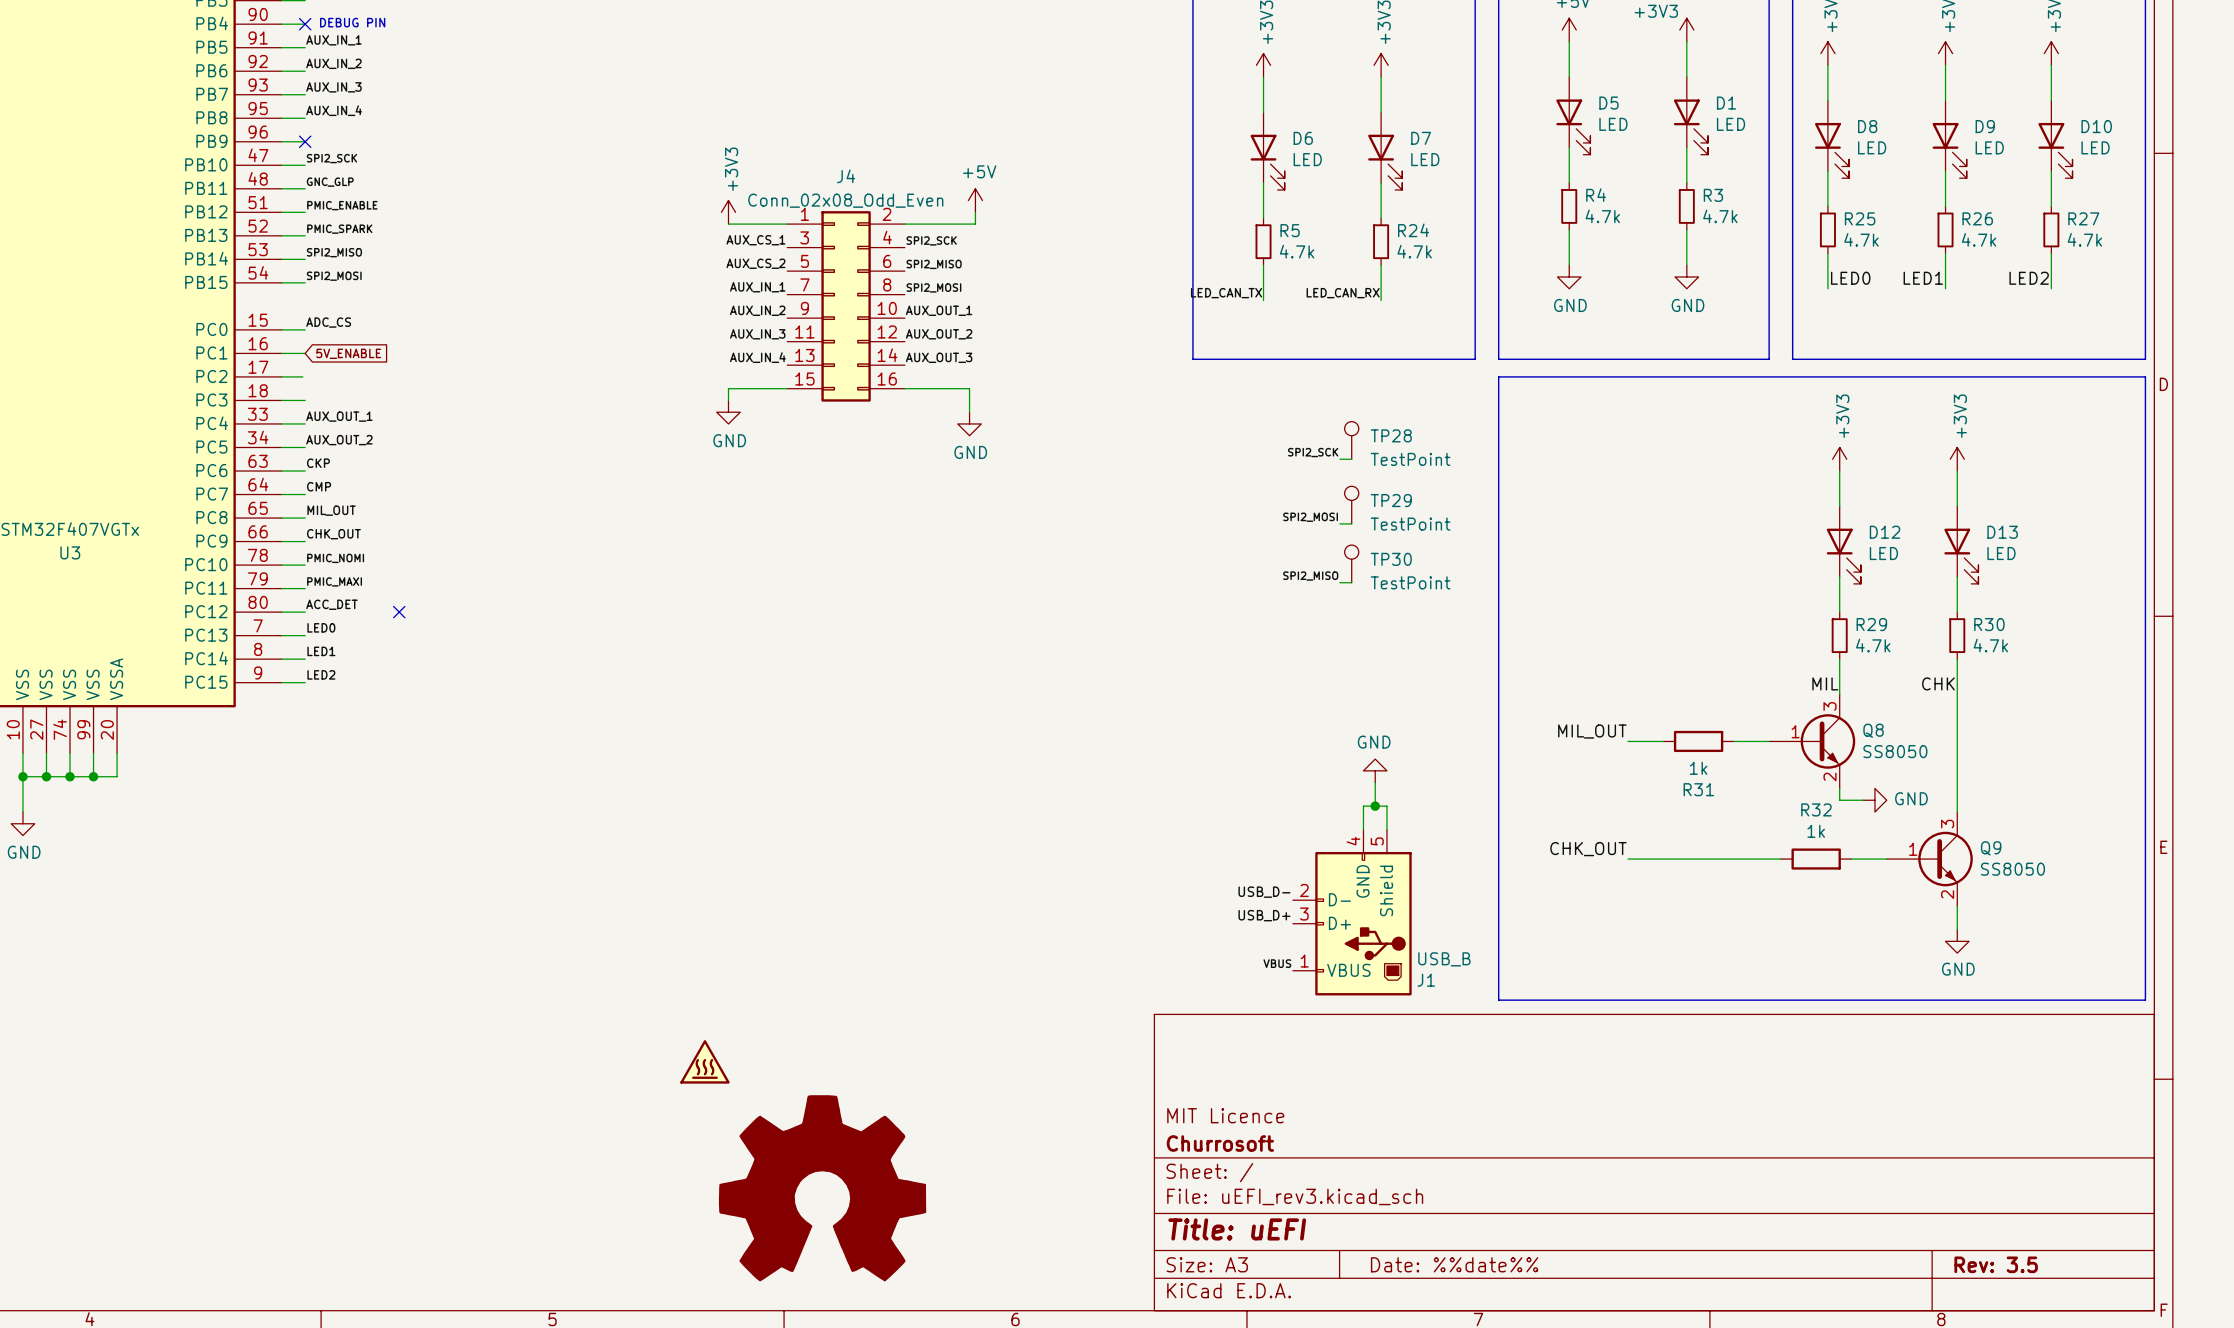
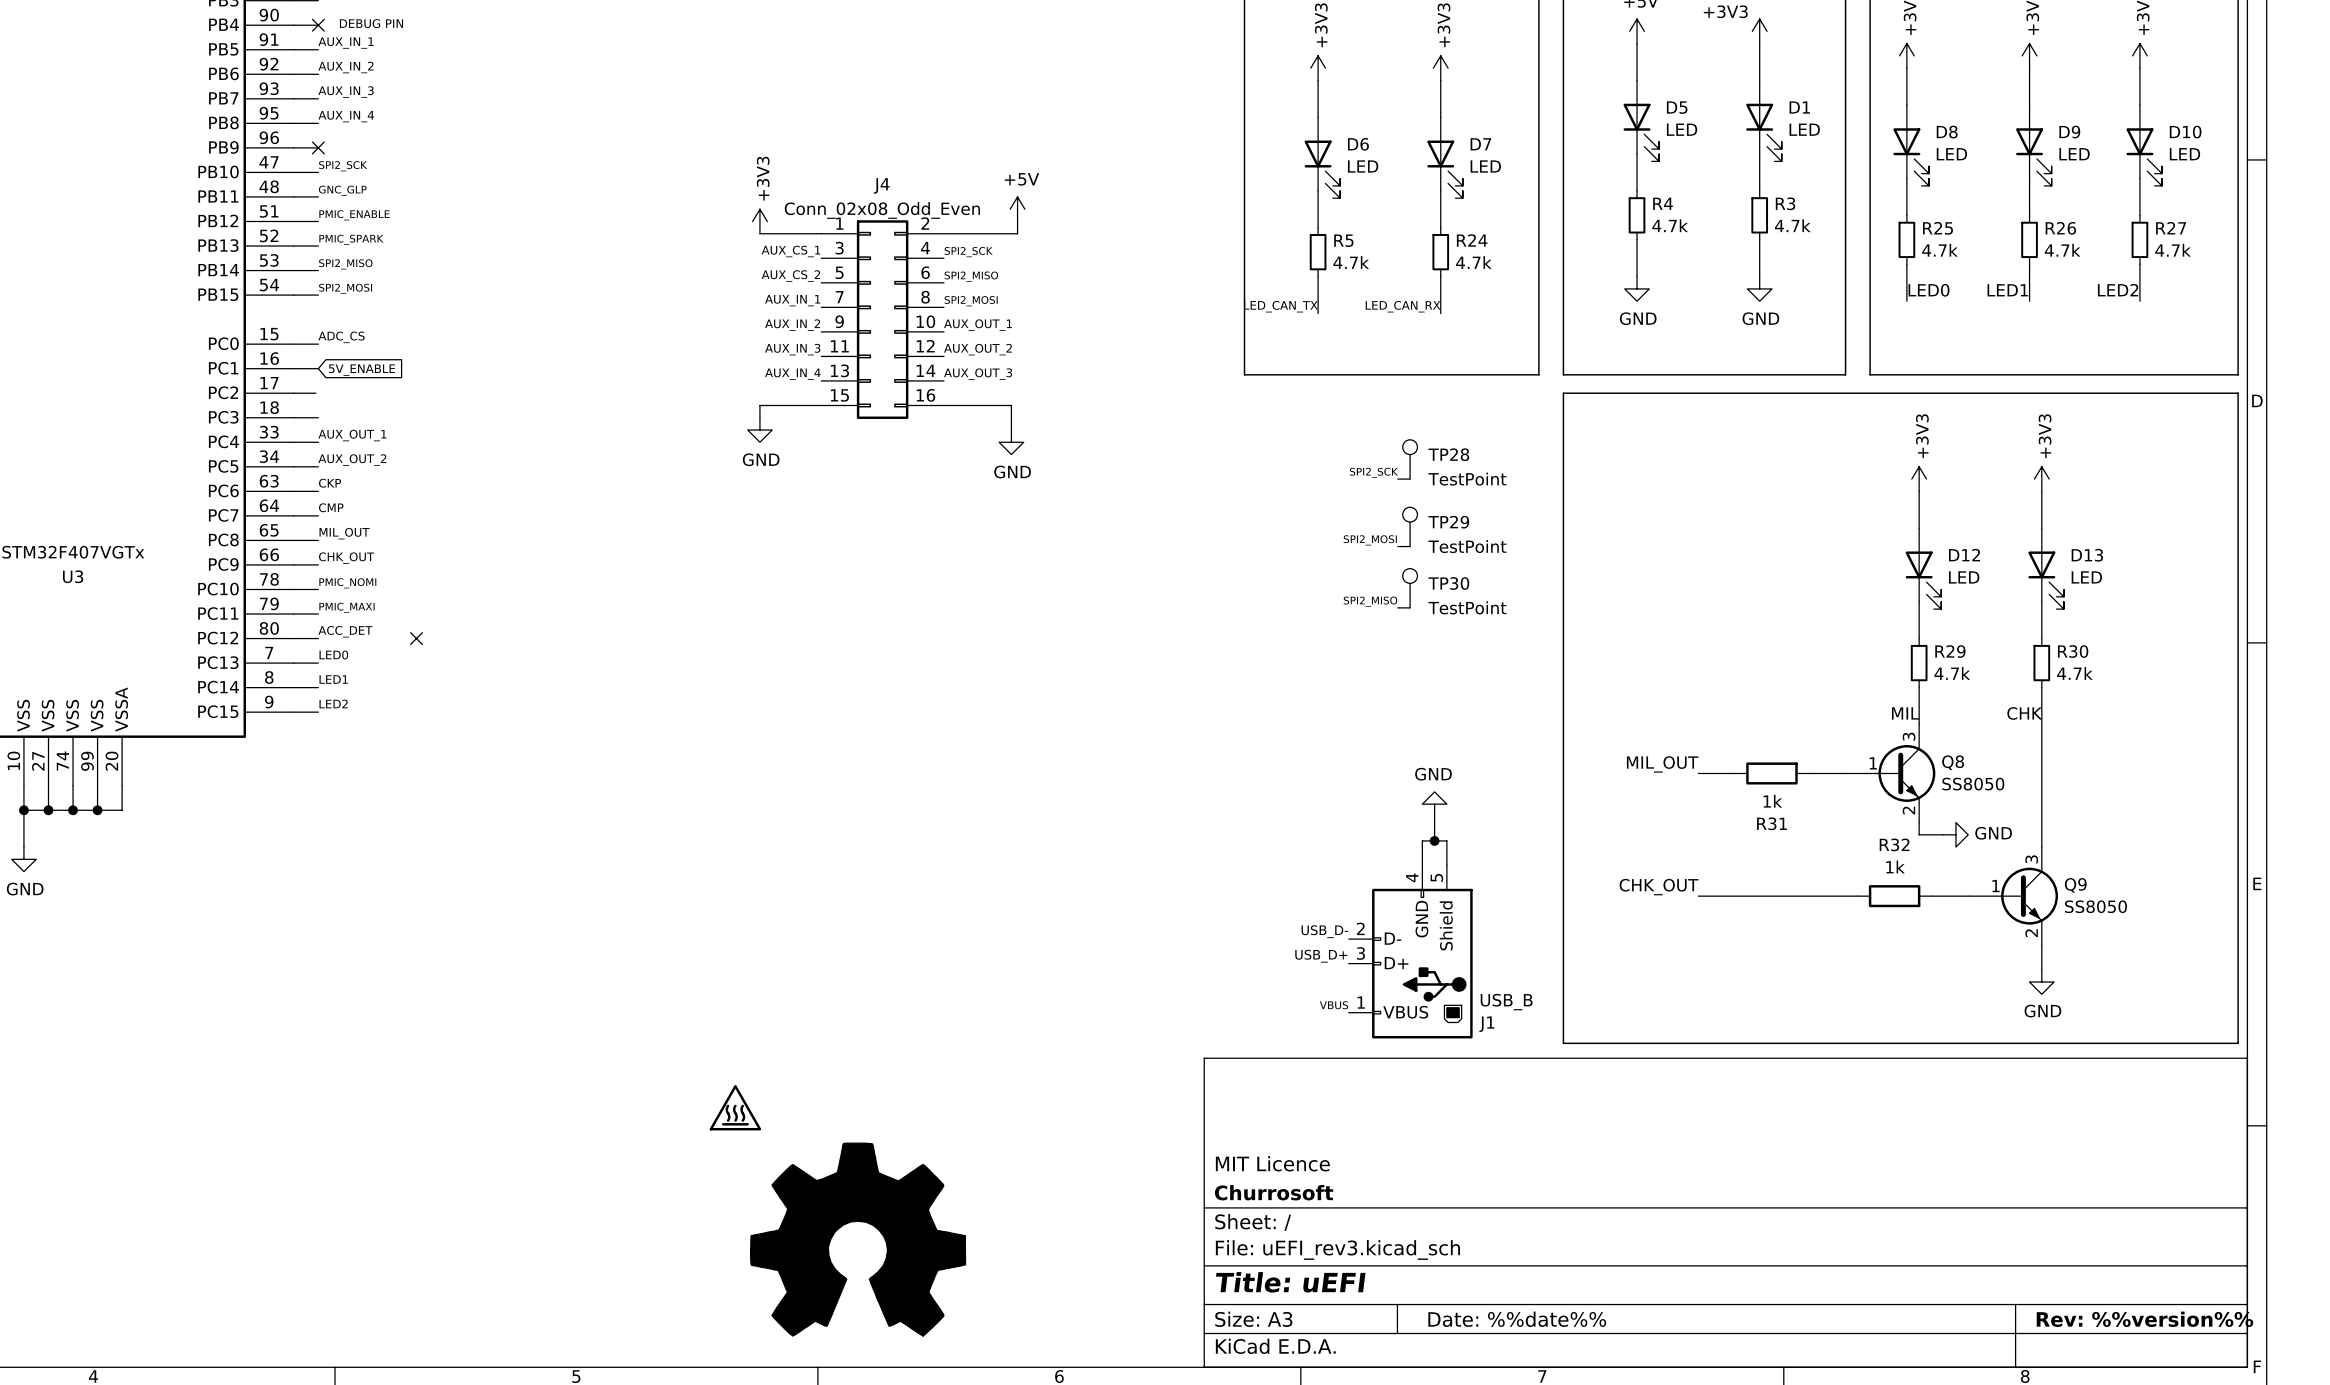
title block: Rev: 3.5 (1996, 1264) -> Rev: %%version%% (2144, 1319)

